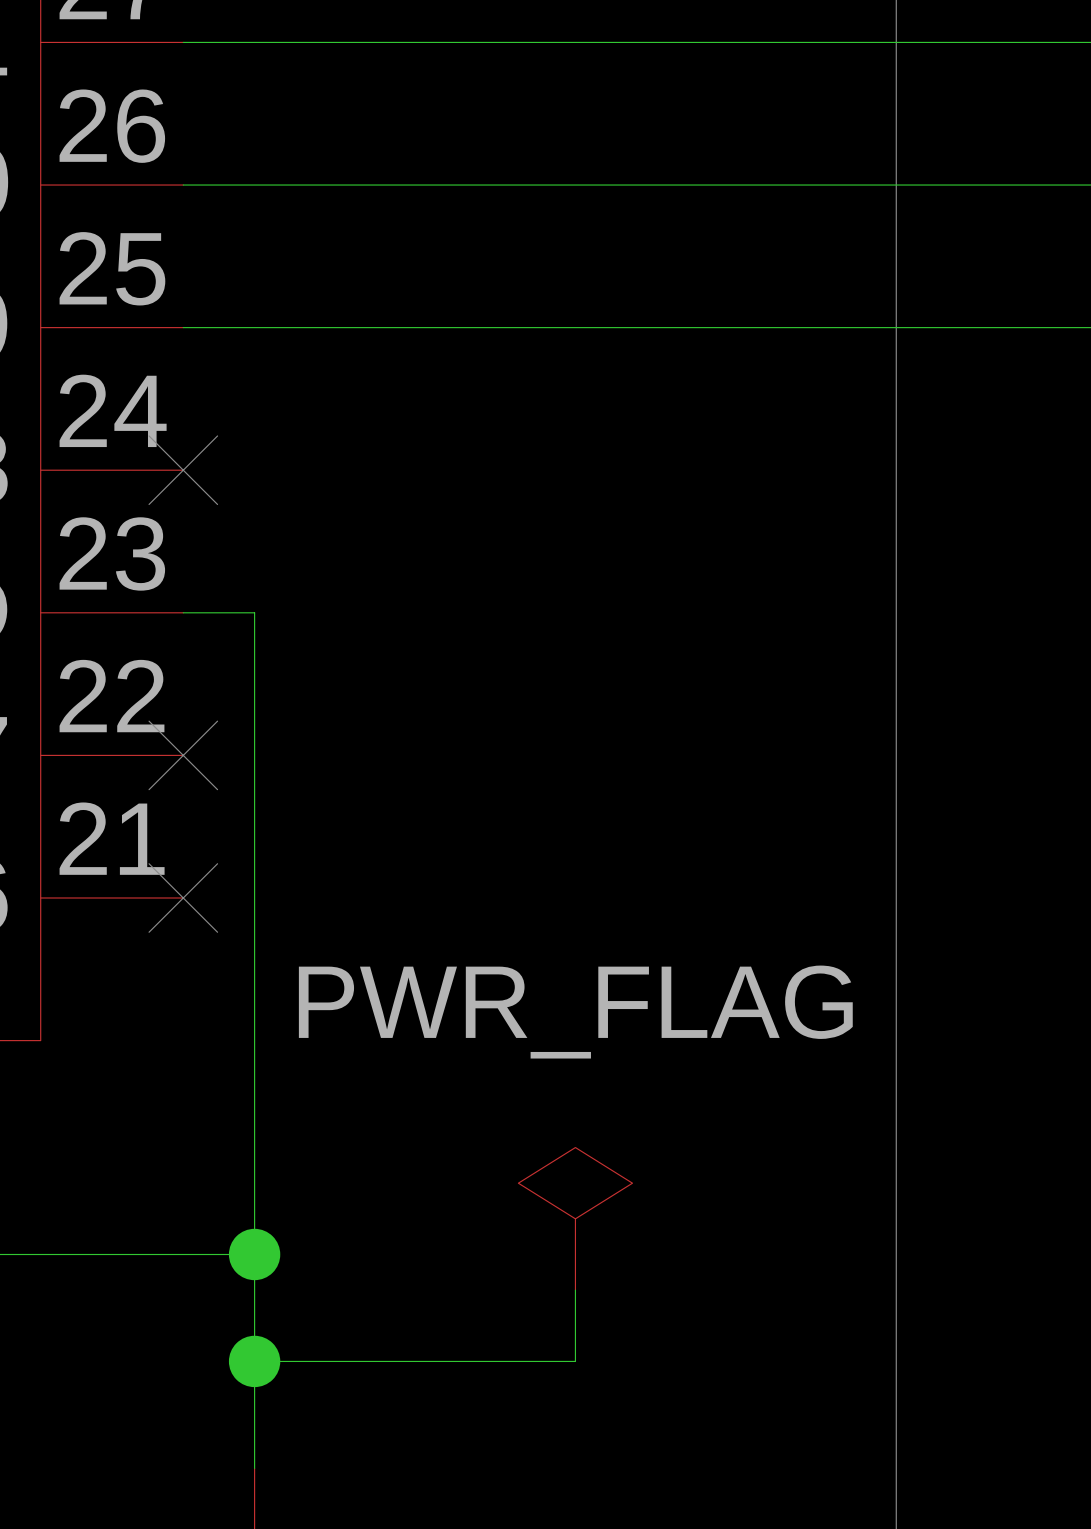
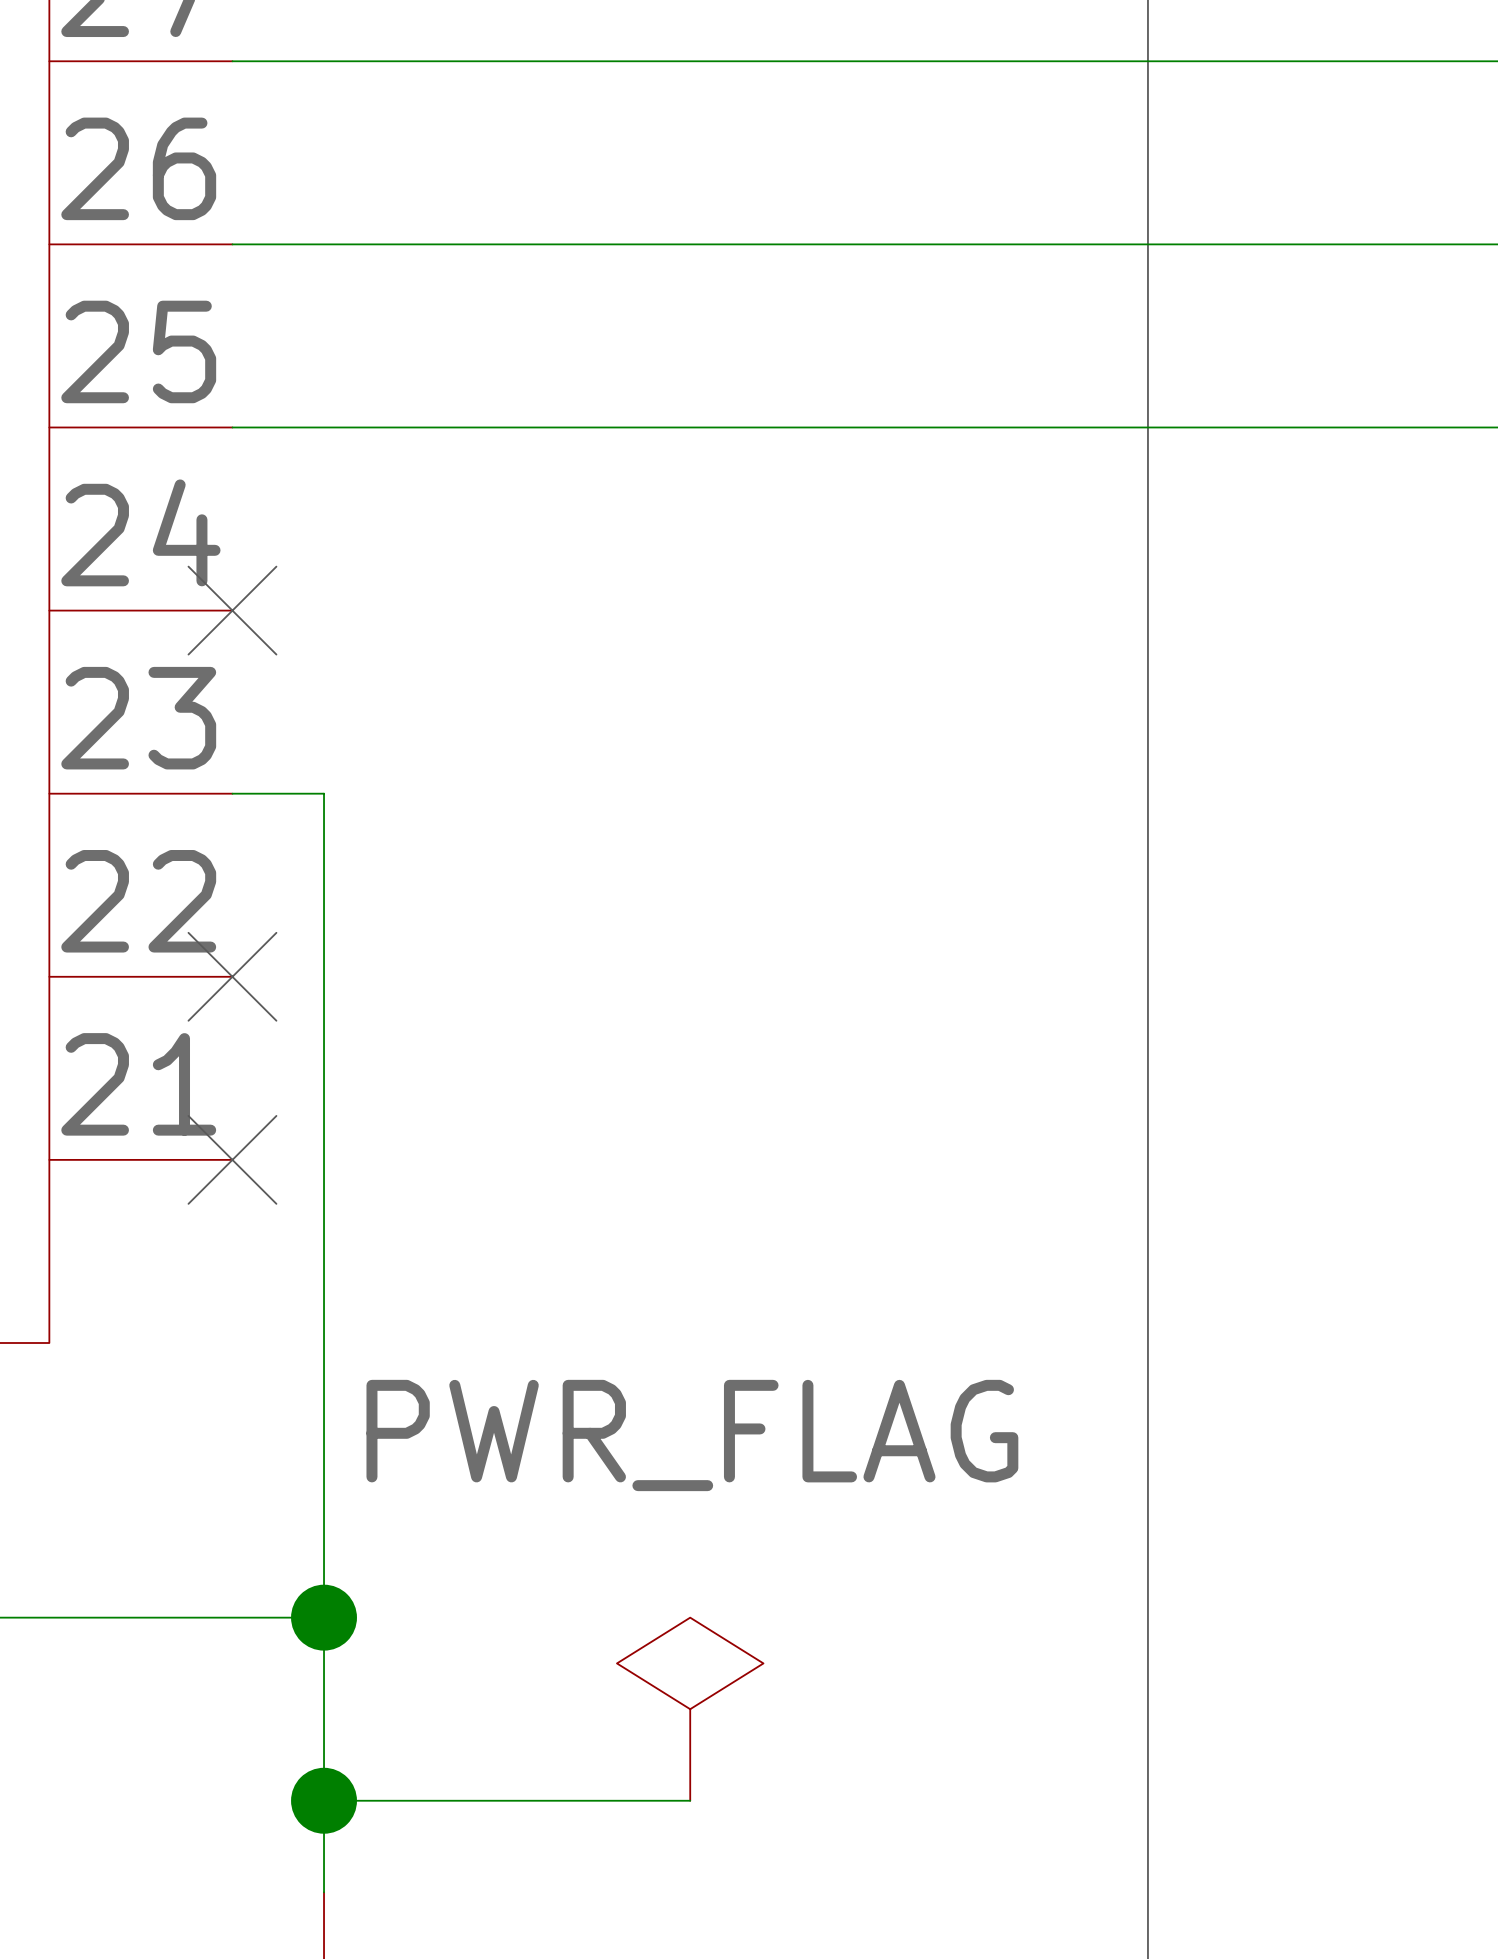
power symbol position: PWR_FLAG (575, 1218) -> PWR_FLAG (690, 1709)
wire: (575, 1290) (575, 1361) (254, 1361) -> none
junction position: (254, 1361) -> (324, 1800)
wire: none -> (324, 1800) (690, 1800)

